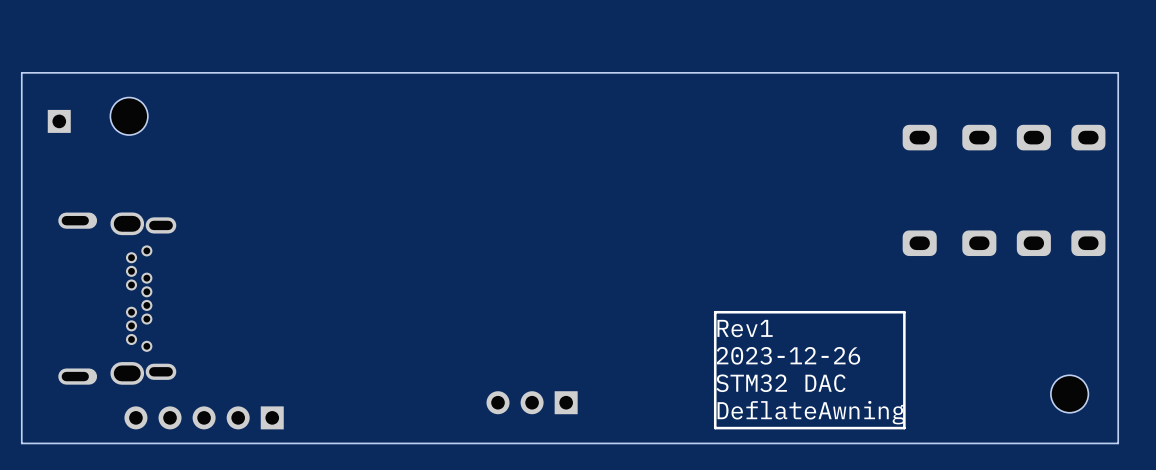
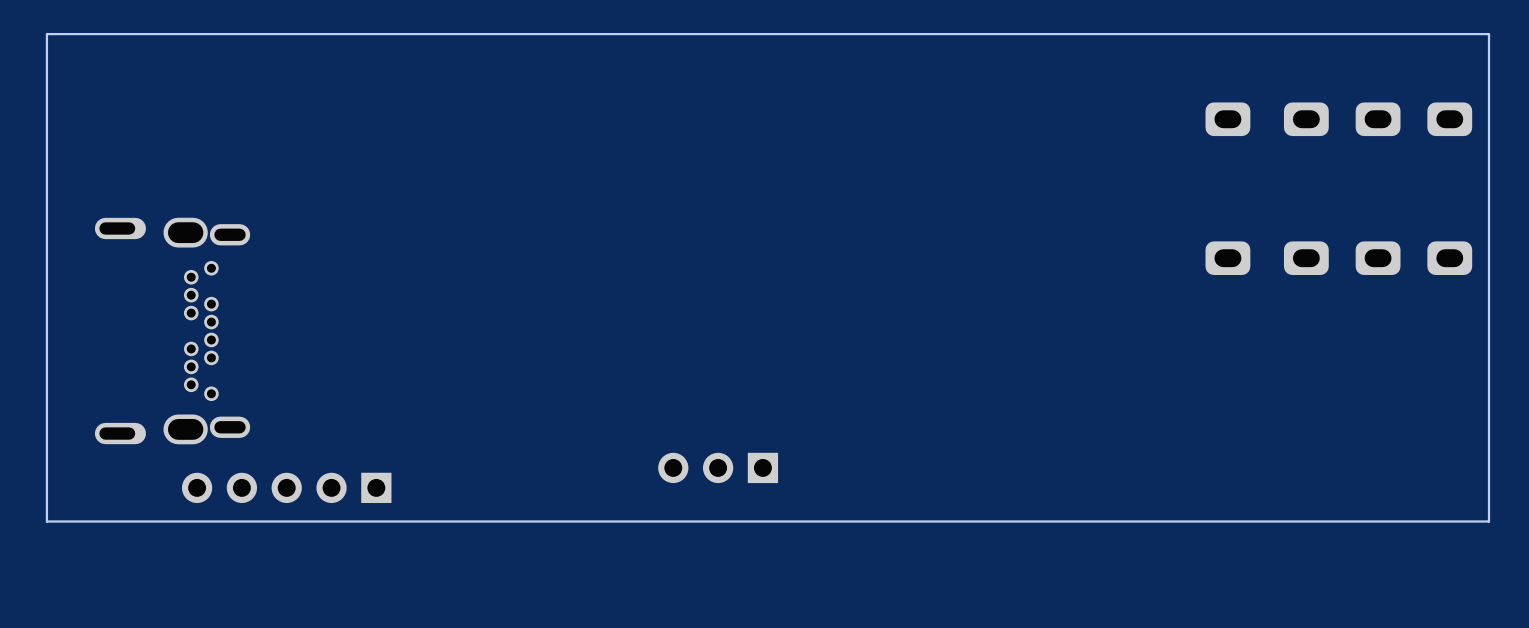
part: (129, 116) -> none
part: (59, 121) -> none
line: (904, 312) (715, 312) (715, 428) (904, 428) (904, 312) -> none
text: Rev1 (745, 328) -> none
text: 2023-12-26 (788, 355) -> none
text: STM32 DAC (780, 383) -> none
part: (1069, 394) -> none
text: DeflateAwning (811, 412) -> none

